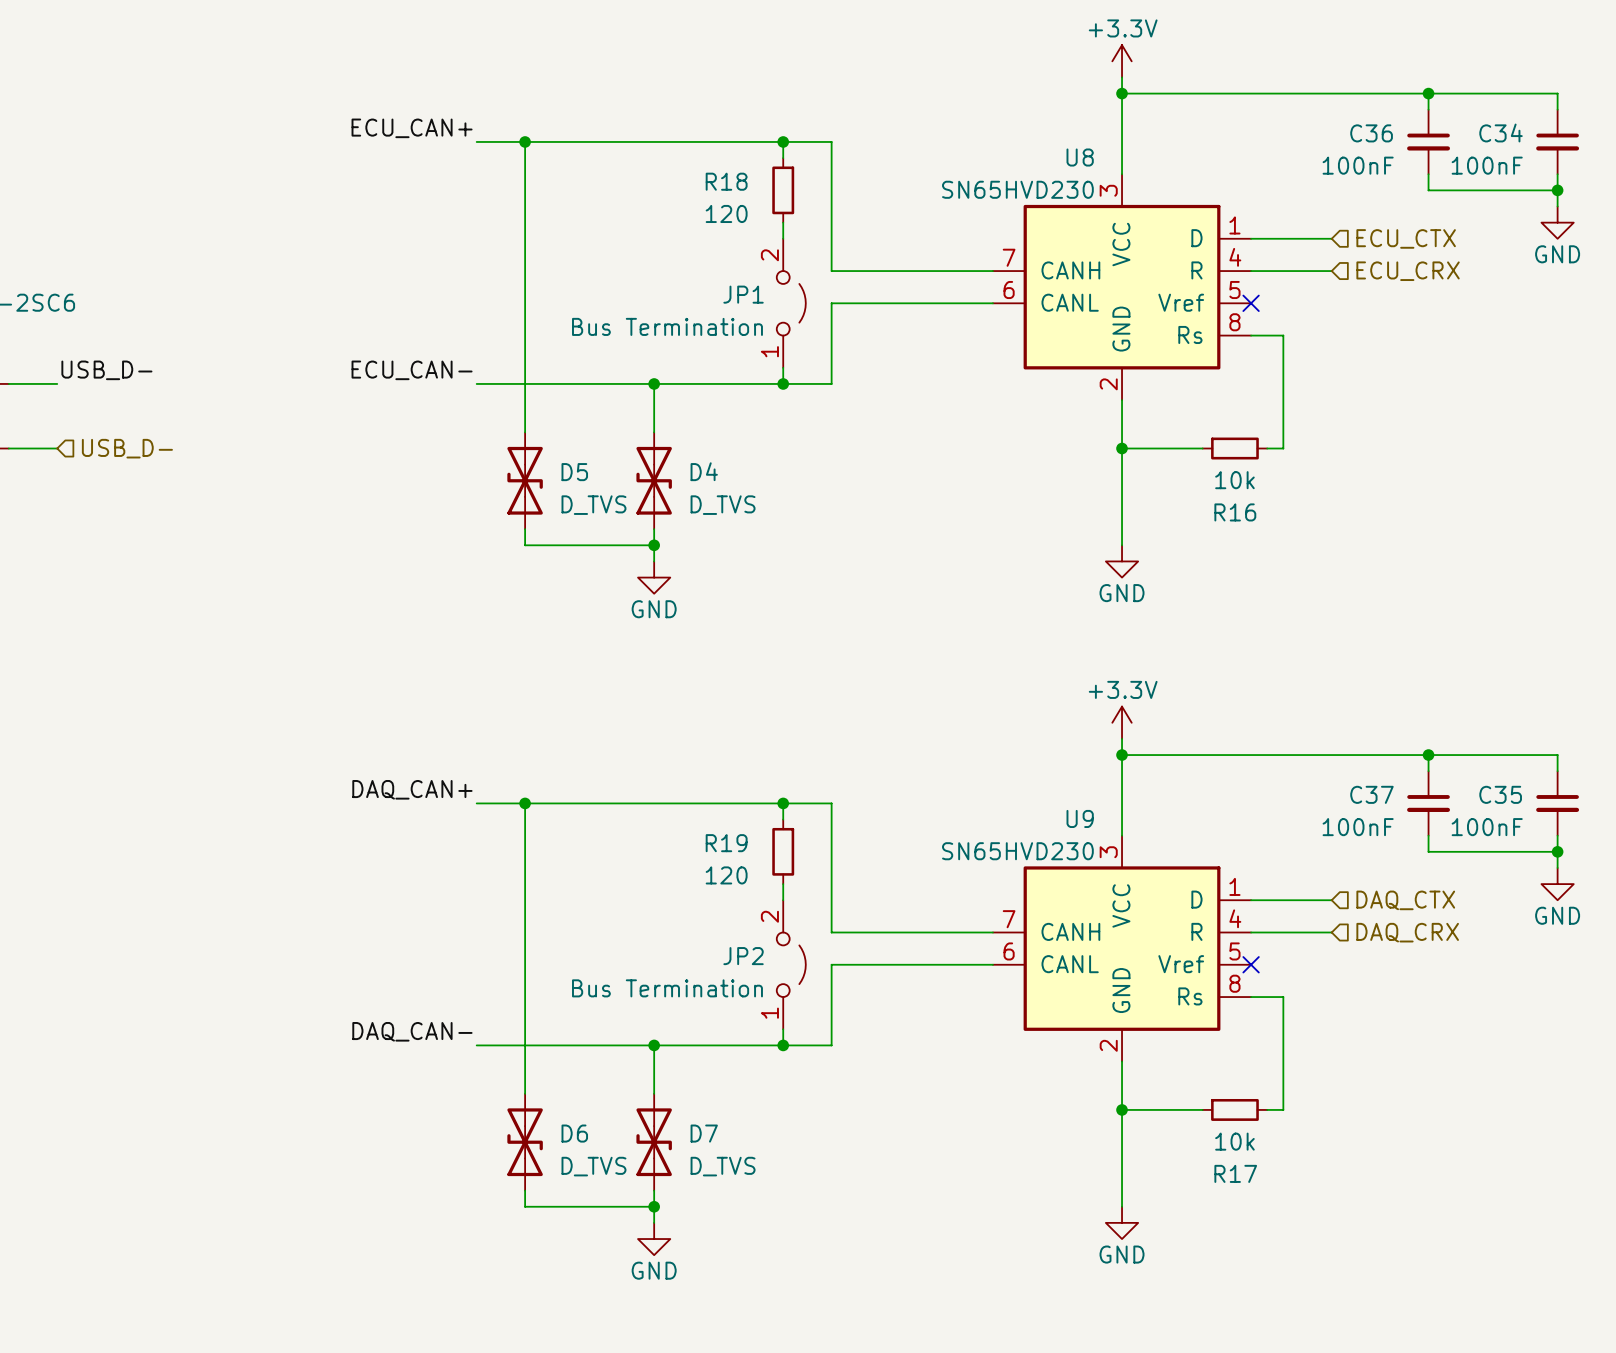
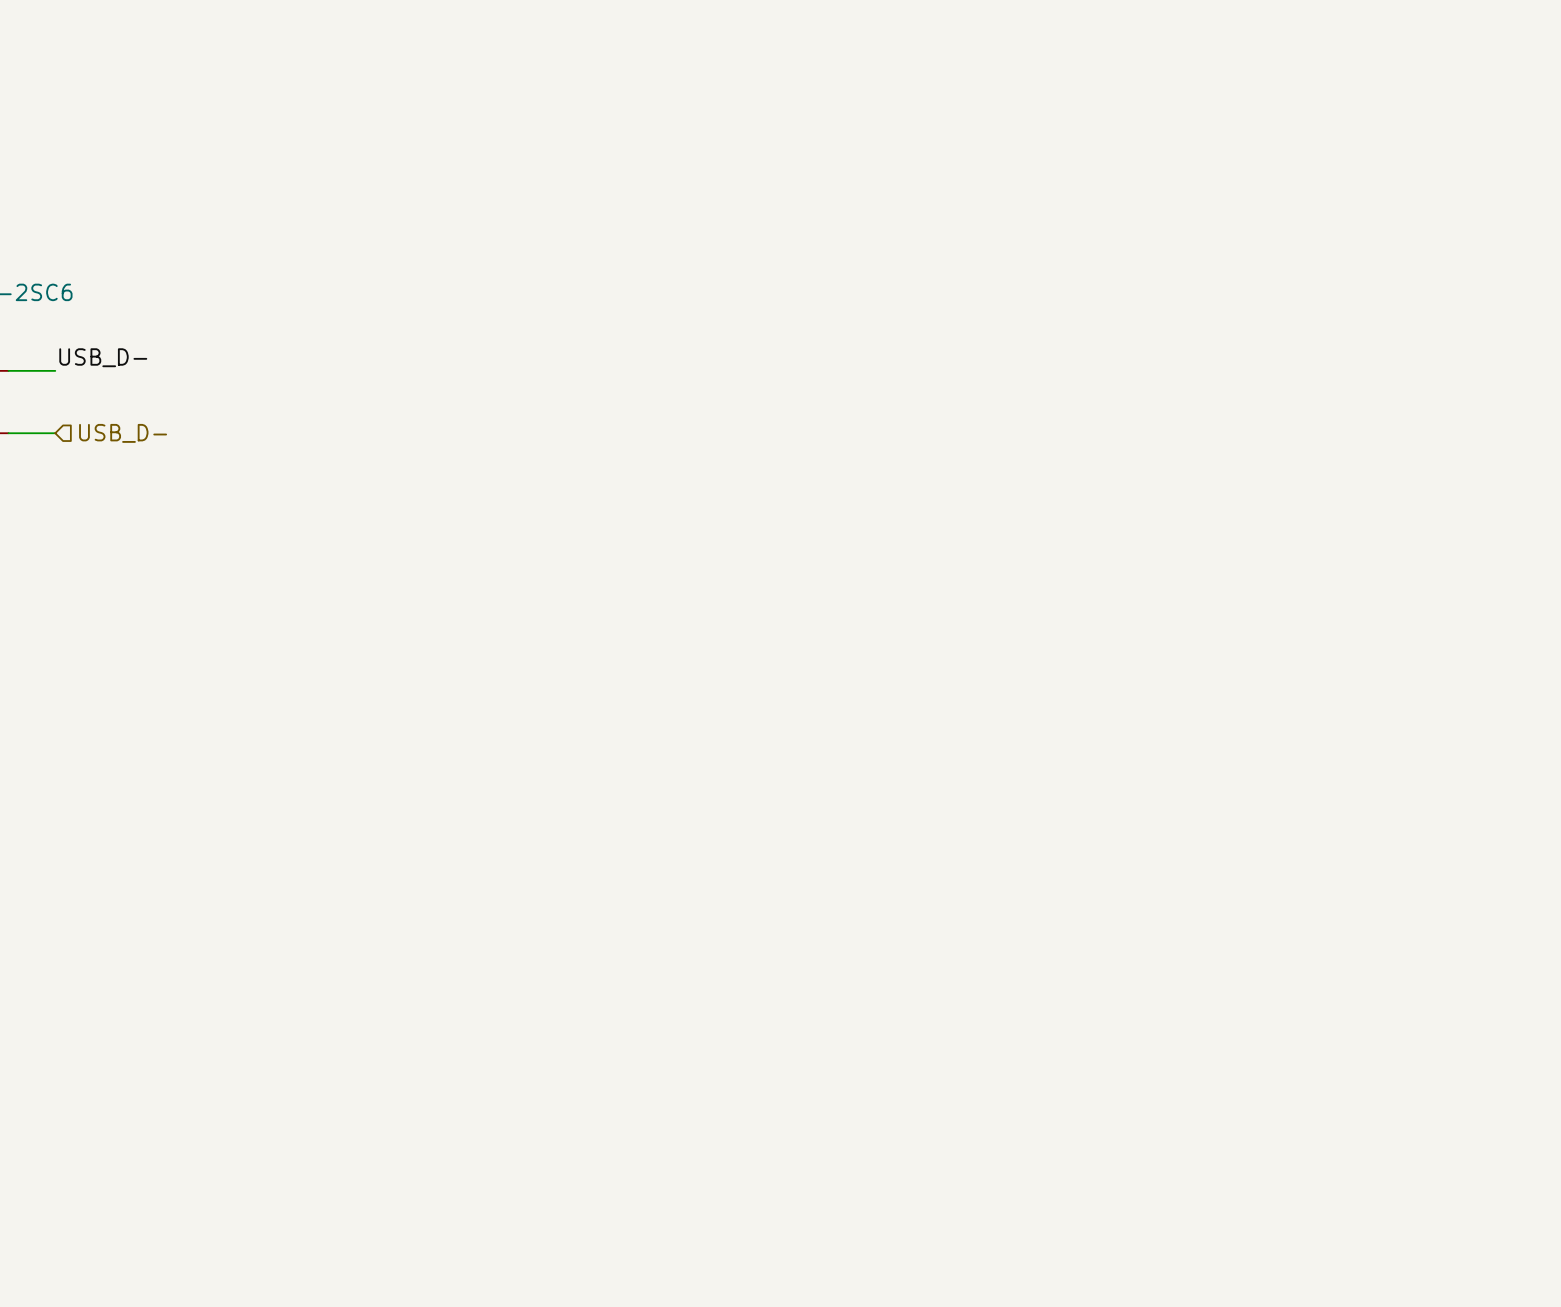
power symbol: +3.3V (1122, 61) -> none
wire: (1122, 77) (1122, 174) -> none
wire: (1122, 93) (1557, 93) (1557, 109) -> none
junction: (1122, 93) -> none
wire: (1428, 93) (1428, 109) -> none
junction: (1428, 93) -> none
label: ECU_CAN+ (412, 128) -> none
wire: (476, 141) (831, 141) (831, 271) (992, 271) -> none
wire: (525, 141) (525, 432) -> none
junction: (525, 141) -> none
wire: (783, 141) (783, 158) -> none
junction: (783, 141) -> none
C36: 100nF (1428, 141) -> none
C34: 100nF (1557, 141) -> none
wire: (1428, 174) (1428, 190) (1557, 190) -> none
wire: (1557, 174) (1557, 206) -> none
R18: 120 (783, 190) -> none
junction: (1557, 190) -> none
wire: (783, 222) (783, 238) -> none
power symbol: GND (1557, 222) -> none
wire: (1251, 238) (1331, 238) -> none
hierarchical label: ECU_CTX (1406, 238) -> none
wire: (1251, 271) (1331, 271) -> none
hierarchical label: ECU_CRX (1408, 271) -> none
U8: SN65HVD230 (1122, 287) -> none
JP1: Bus Termination (791, 303) -> none
wire: (992, 303) (831, 303) (831, 383) (476, 383) -> none
no-connect mark: (1251, 303) -> none
wire: (1251, 335) (1283, 335) (1283, 448) (1267, 448) -> none
wire: (783, 367) (783, 383) -> none
label: ECU_CAN- (412, 370) -> none
wire: (654, 383) (654, 432) -> none
junction: (654, 383) -> none
junction: (783, 383) -> none
wire: (1122, 400) (1122, 545) -> none
wire: (1122, 448) (1202, 448) -> none
junction: (1122, 448) -> none
R16: 10k (1234, 448) -> none
D5: D_TVS (525, 480) -> none
D4: D_TVS (654, 480) -> none
wire: (525, 529) (525, 545) (654, 545) -> none
wire: (654, 529) (654, 561) -> none
junction: (654, 545) -> none
power symbol: GND (1122, 561) -> none
power symbol: GND (654, 577) -> none
power symbol: +3.3V (1122, 722) -> none
wire: (1122, 738) (1122, 835) -> none
wire: (1122, 755) (1557, 755) (1557, 771) -> none
junction: (1122, 755) -> none
wire: (1428, 755) (1428, 771) -> none
junction: (1428, 755) -> none
label: DAQ_CAN+ (412, 789) -> none
wire: (476, 803) (831, 803) (831, 932) (992, 932) -> none
wire: (525, 803) (525, 1093) -> none
junction: (525, 803) -> none
wire: (783, 803) (783, 819) -> none
junction: (783, 803) -> none
C37: 100nF (1428, 803) -> none
C35: 100nF (1557, 803) -> none
wire: (1428, 835) (1428, 851) (1557, 851) -> none
wire: (1557, 835) (1557, 867) -> none
R19: 120 (783, 851) -> none
junction: (1557, 851) -> none
wire: (783, 884) (783, 900) -> none
power symbol: GND (1557, 884) -> none
wire: (1251, 900) (1331, 900) -> none
hierarchical label: DAQ_CTX (1405, 900) -> none
wire: (1251, 932) (1331, 932) -> none
hierarchical label: DAQ_CRX (1407, 932) -> none
U9: SN65HVD230 (1122, 948) -> none
JP2: Bus Termination (791, 964) -> none
wire: (992, 964) (831, 964) (831, 1045) (476, 1045) -> none
no-connect mark: (1251, 964) -> none
wire: (1251, 997) (1283, 997) (1283, 1109) (1267, 1109) -> none
wire: (783, 1029) (783, 1045) -> none
label: DAQ_CAN- (412, 1031) -> none
wire: (654, 1045) (654, 1093) -> none
junction: (654, 1045) -> none
junction: (783, 1045) -> none
wire: (1122, 1061) (1122, 1206) -> none
wire: (1122, 1109) (1202, 1109) -> none
junction: (1122, 1109) -> none
R17: 10k (1234, 1109) -> none
D6: D_TVS (525, 1142) -> none
D7: D_TVS (654, 1142) -> none
wire: (525, 1190) (525, 1206) (654, 1206) -> none
wire: (654, 1190) (654, 1222) -> none
junction: (654, 1206) -> none
power symbol: GND (1122, 1222) -> none
power symbol: GND (654, 1239) -> none

